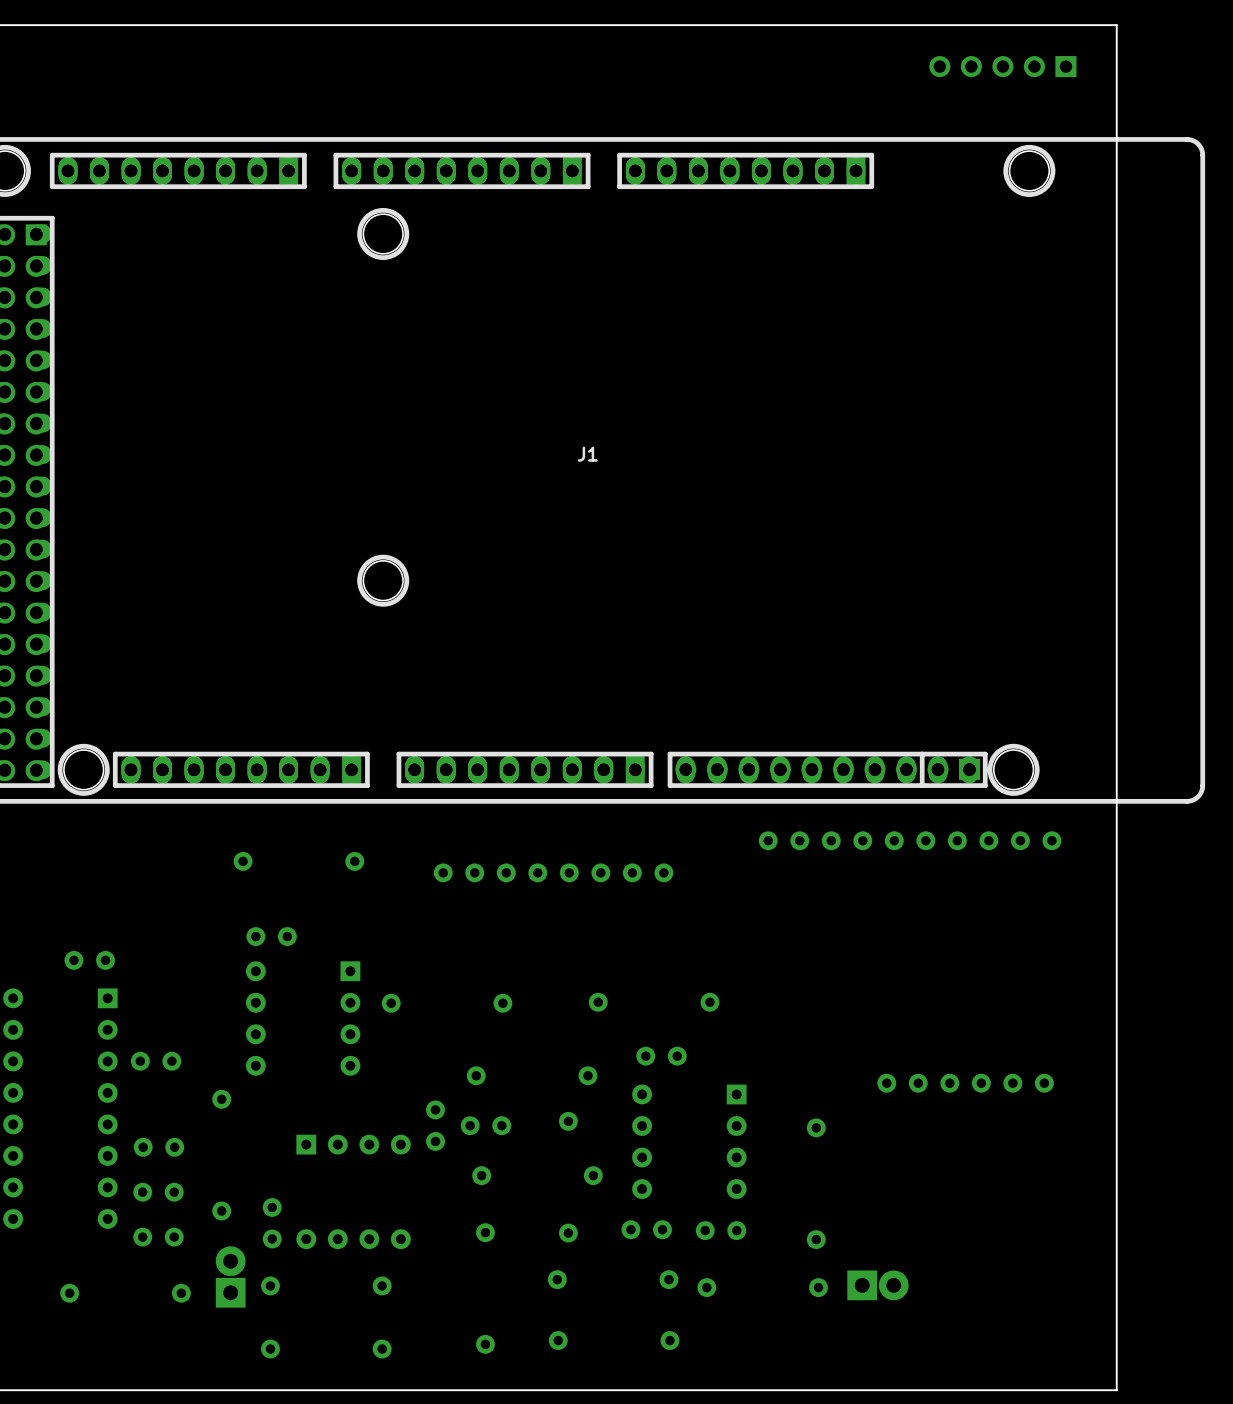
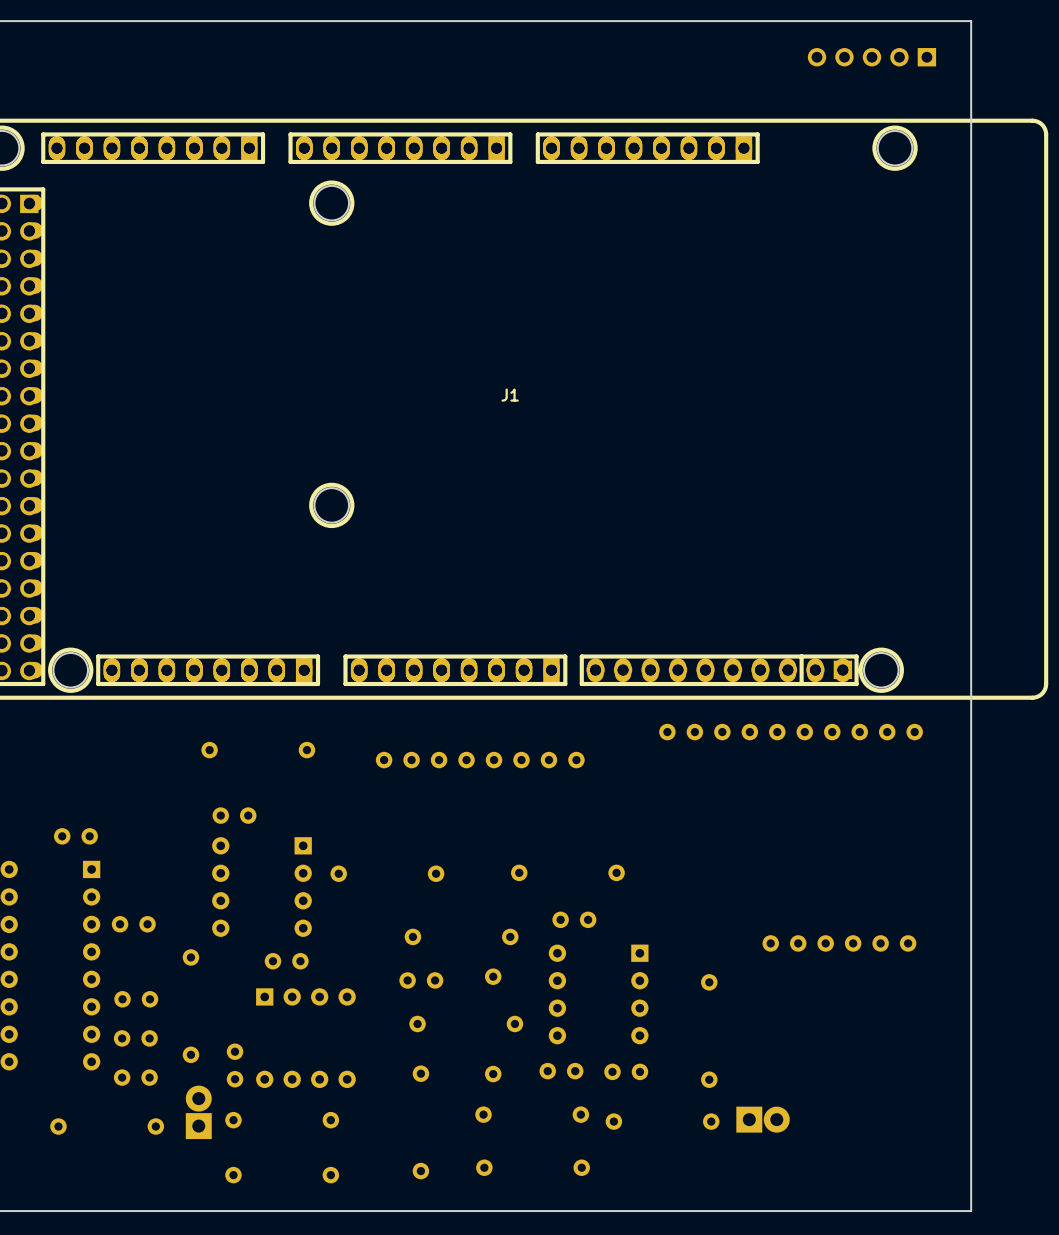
part rotation: 0° (435, 1125) -> 90° clockwise (286, 961)
part position: (435, 1125) -> (286, 961)

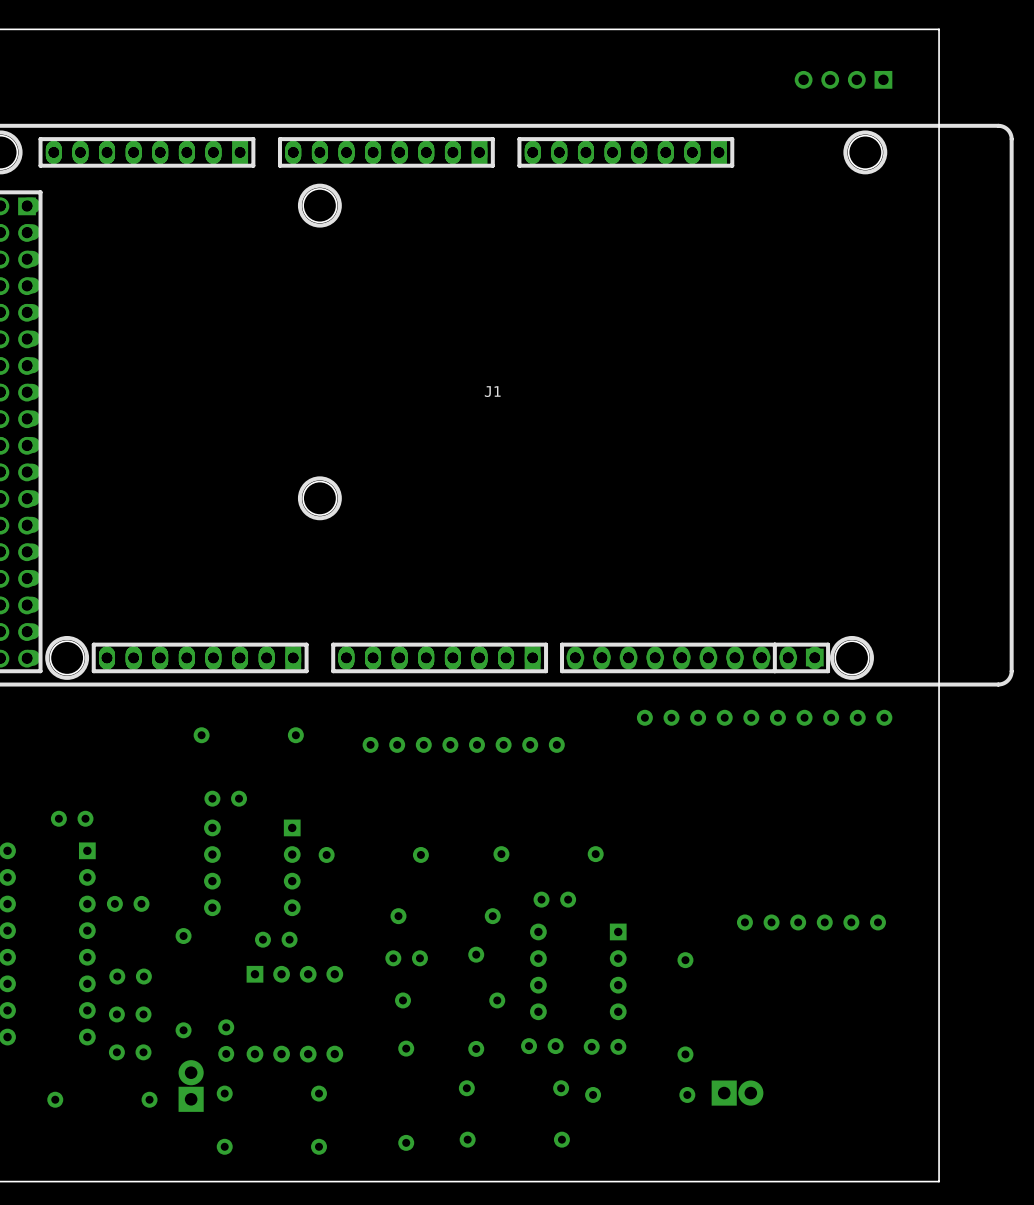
part: (871, 57) -> none
part: none -> (843, 79)

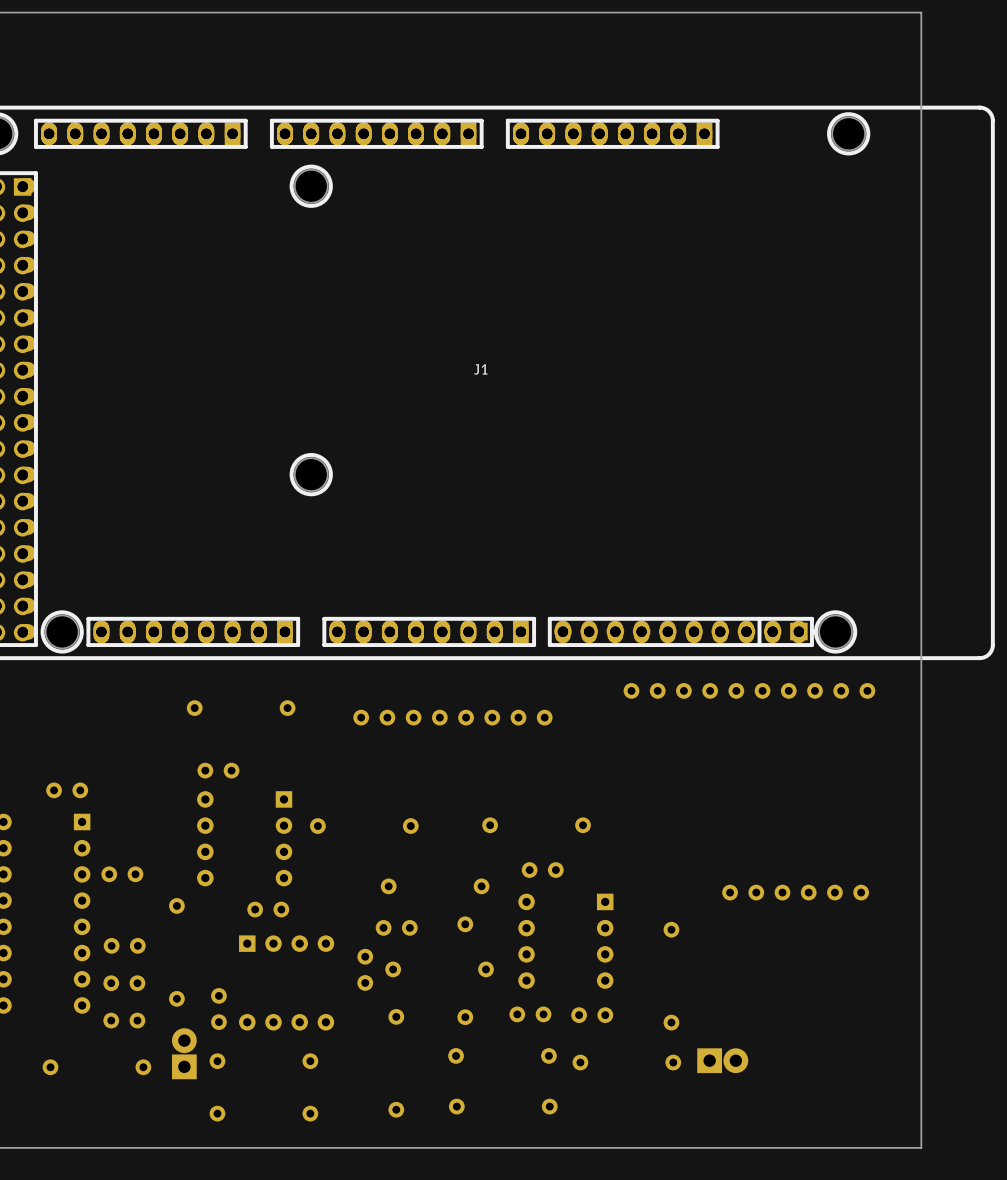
part: (843, 79) -> none
part: none -> (365, 969)

